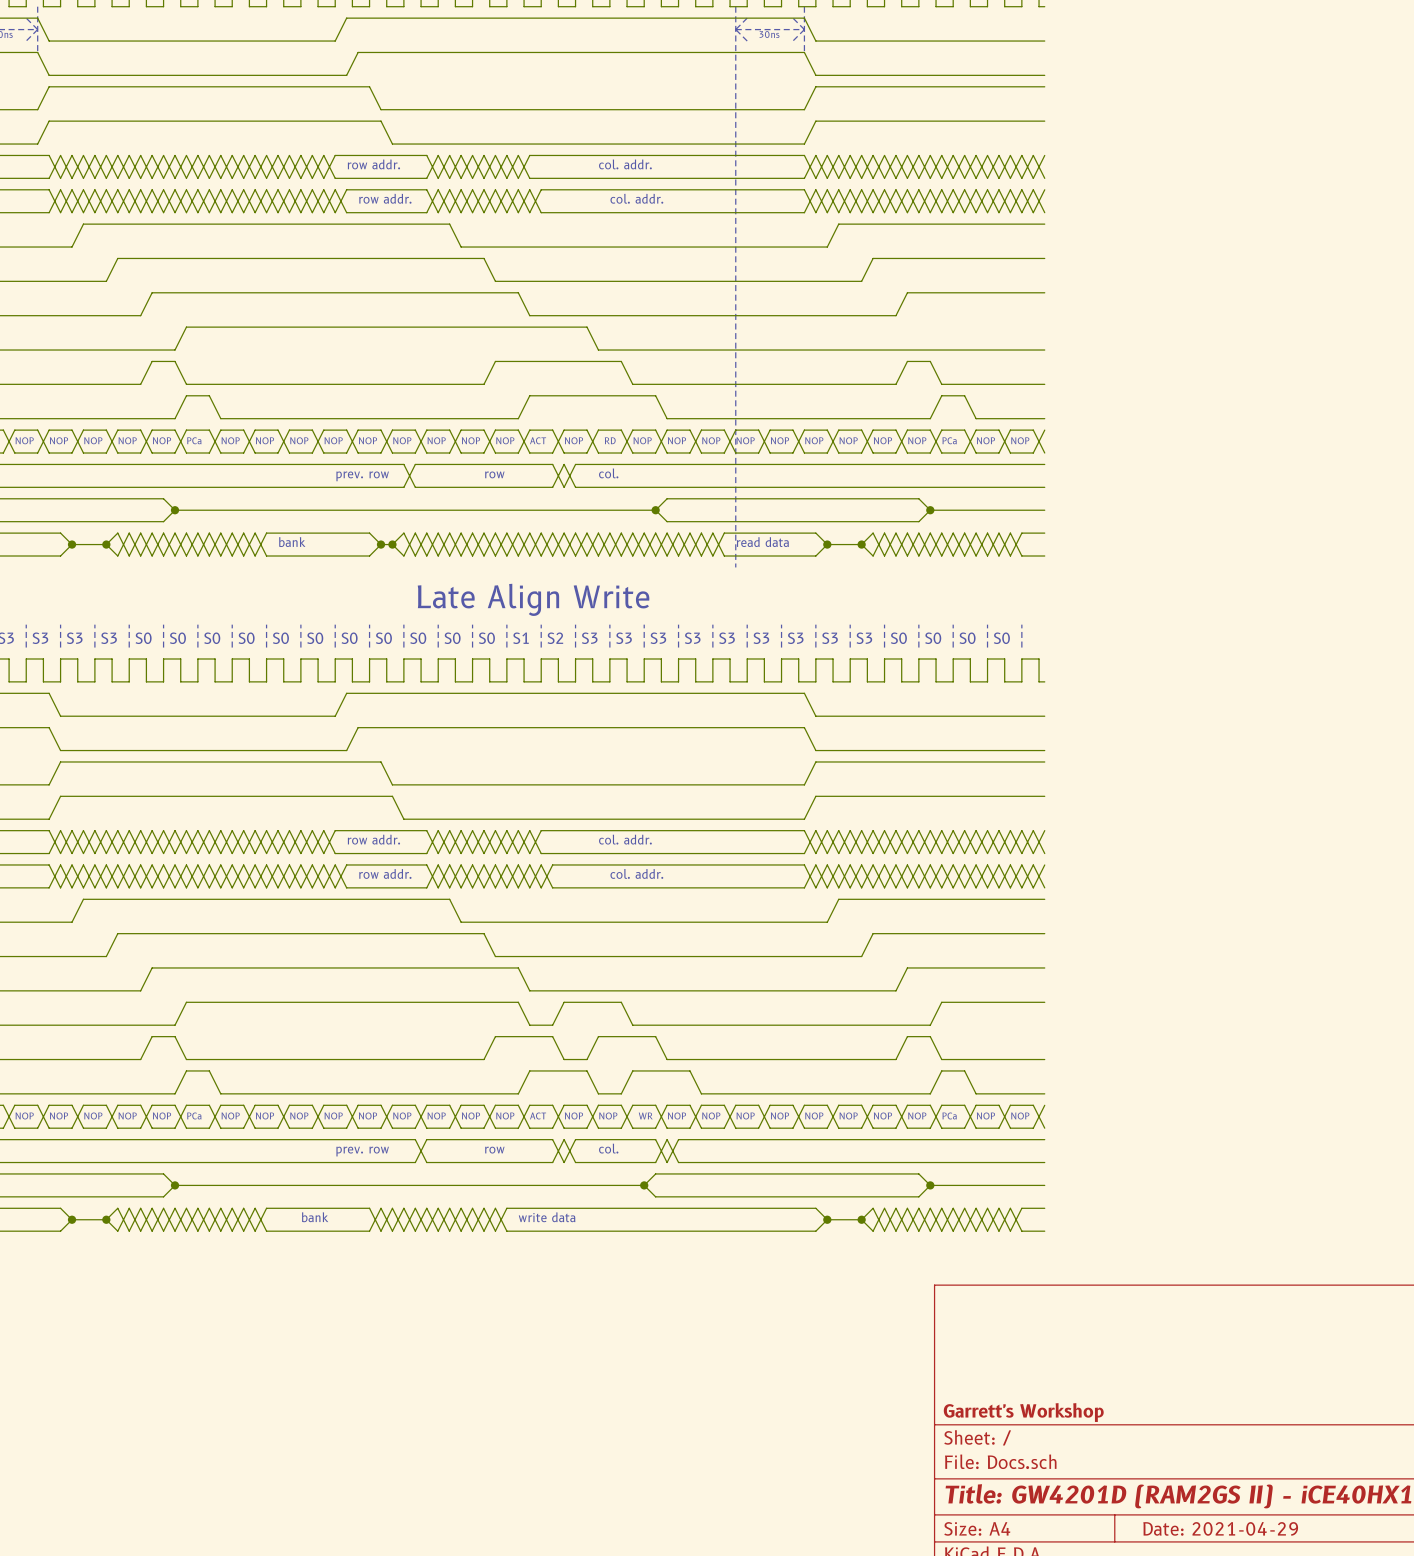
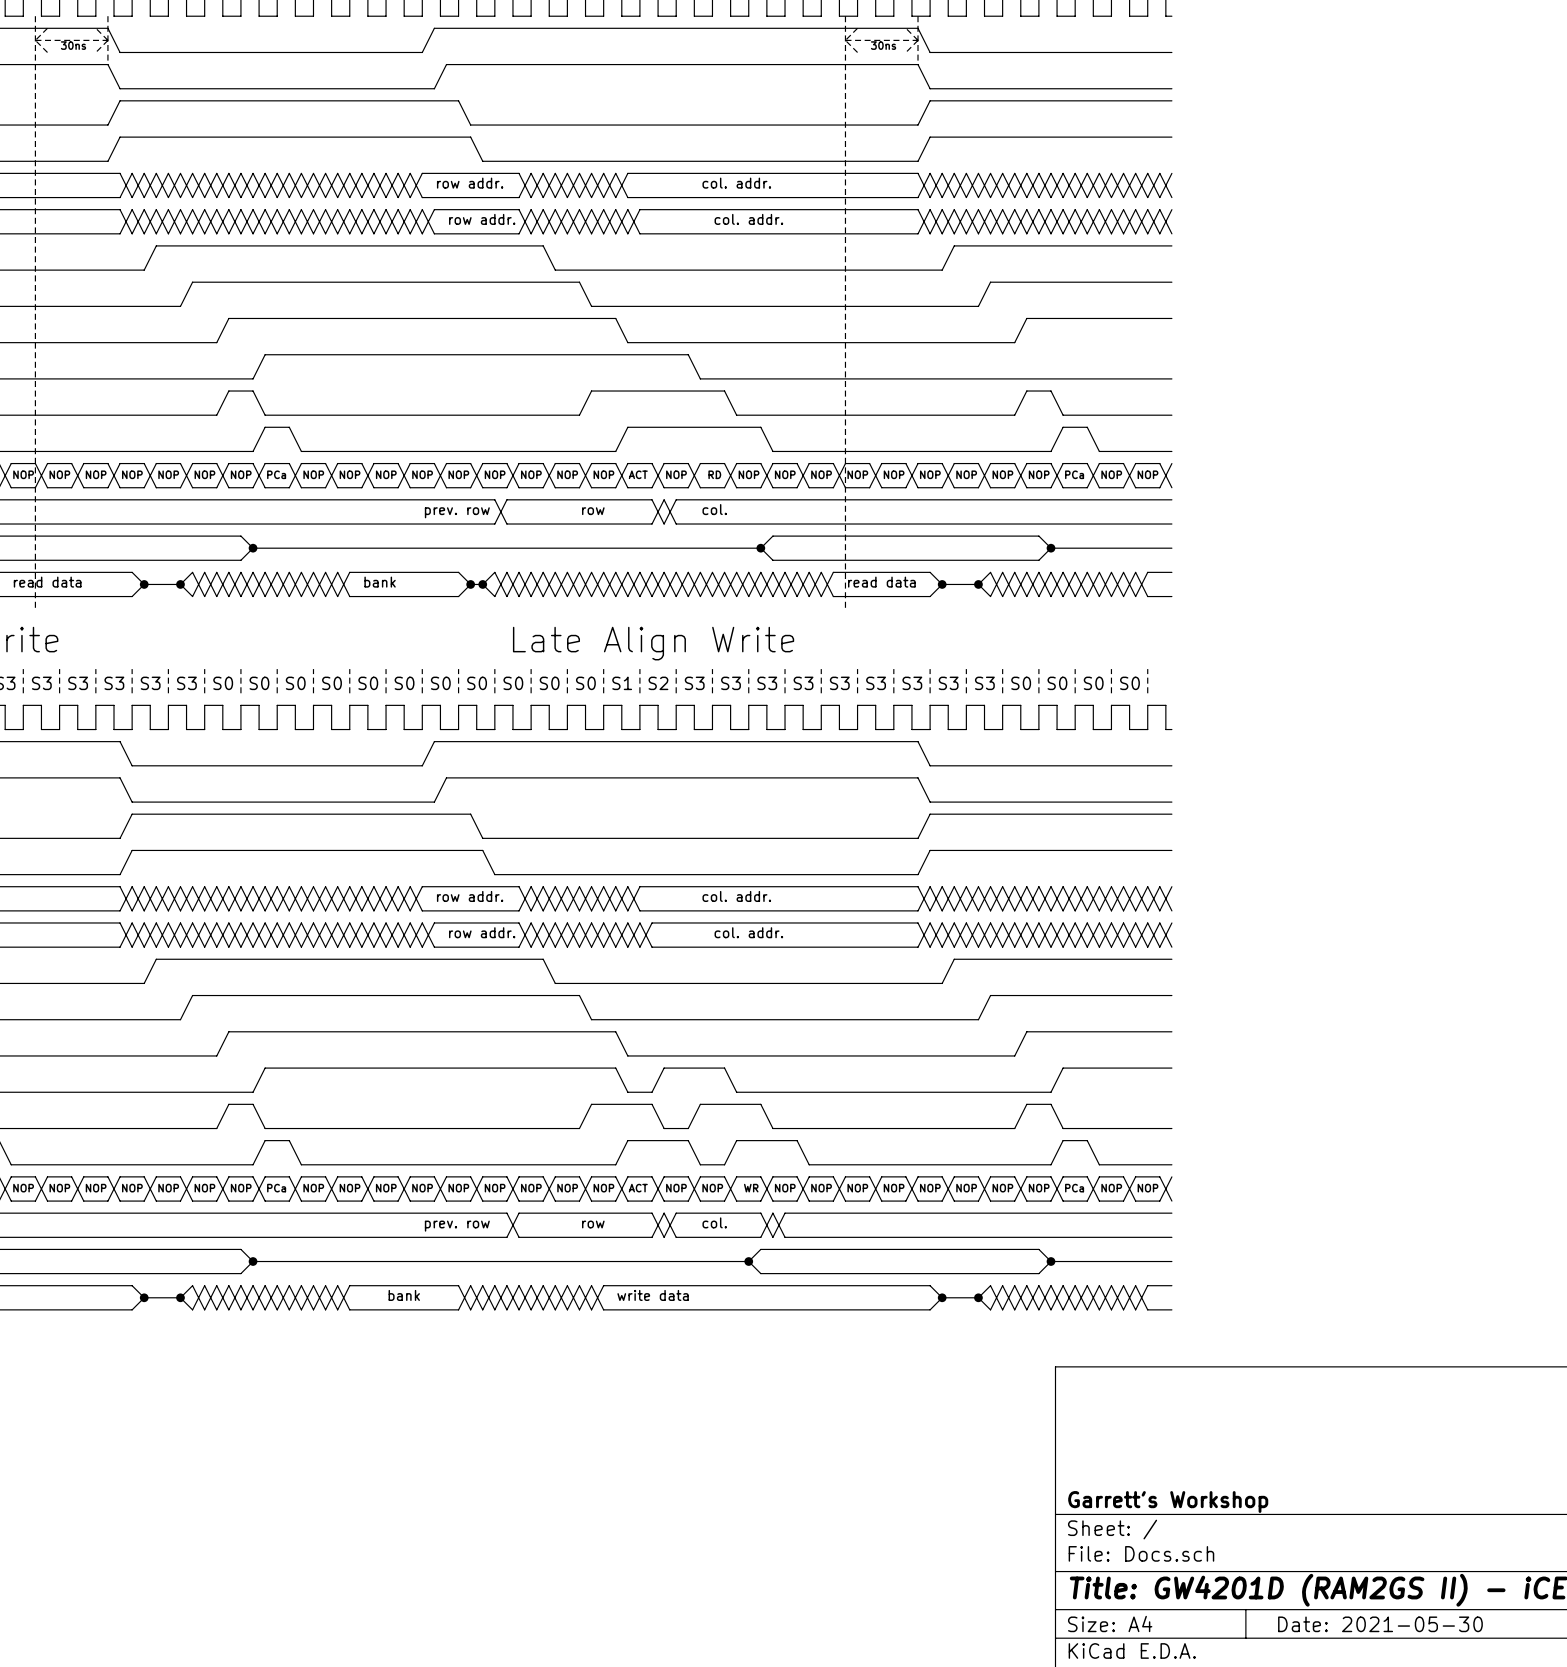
title block: Date: 2021-04-29 (1220, 1528) -> Date: 2021-05-30 (1380, 1624)

